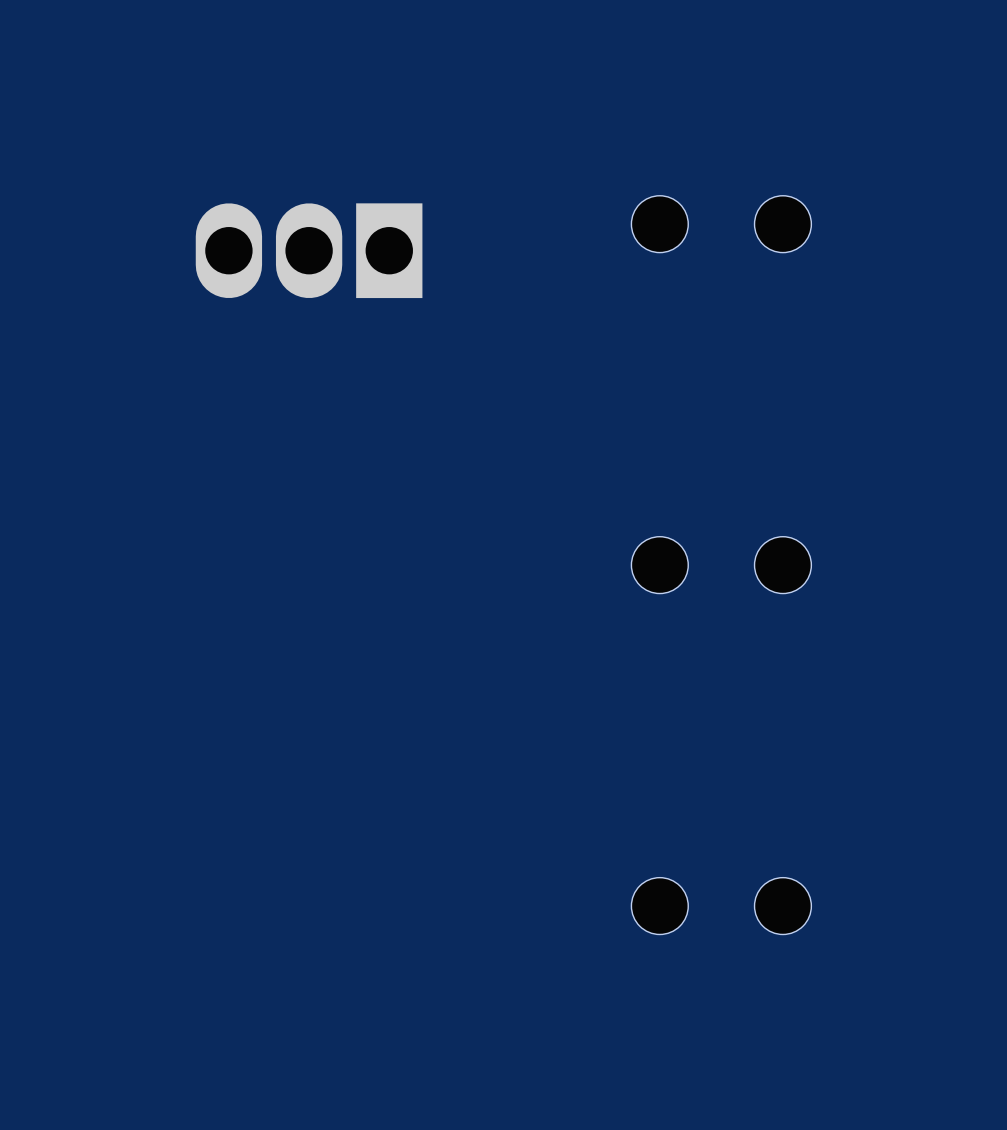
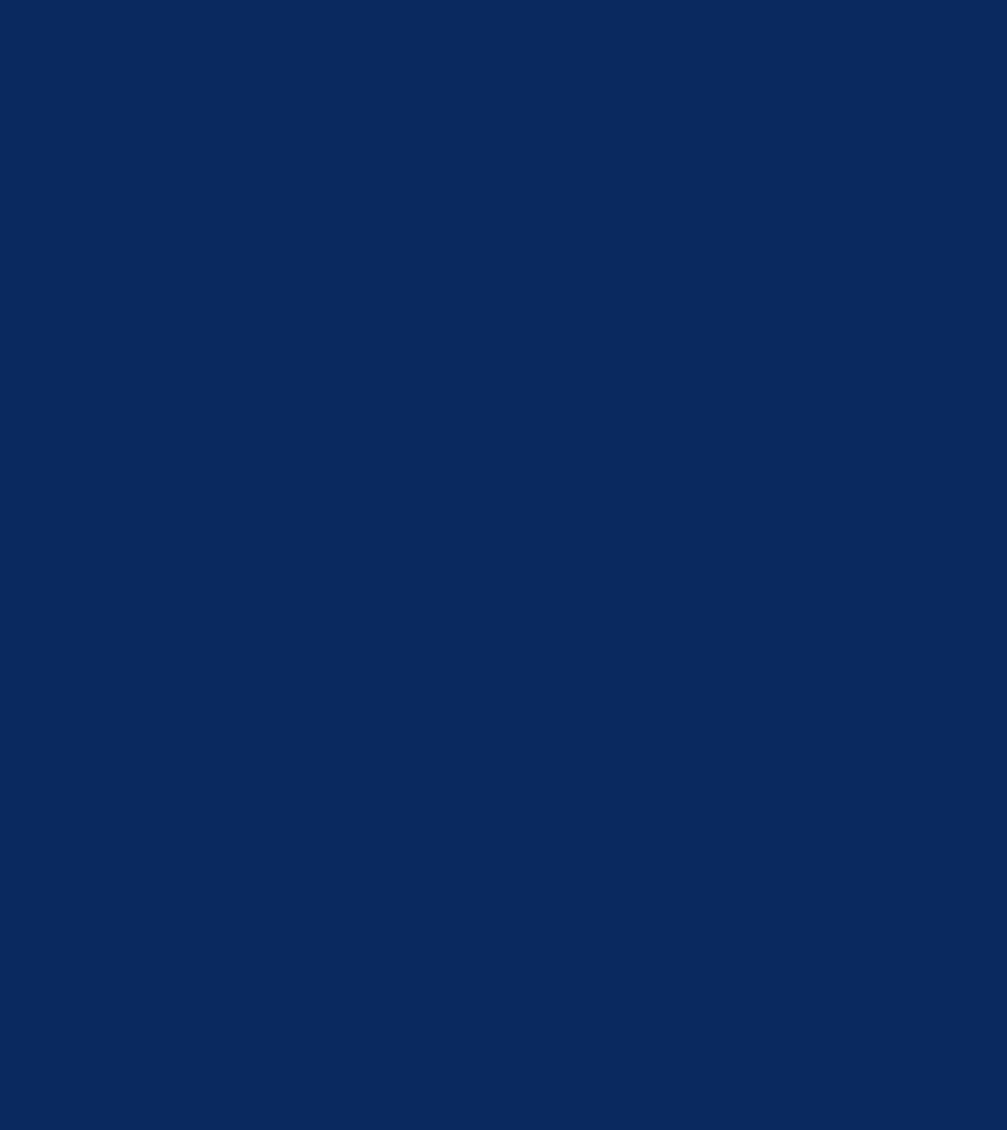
part: (721, 224) -> none
part: (309, 250) -> none
part: (721, 565) -> none
part: (721, 906) -> none

